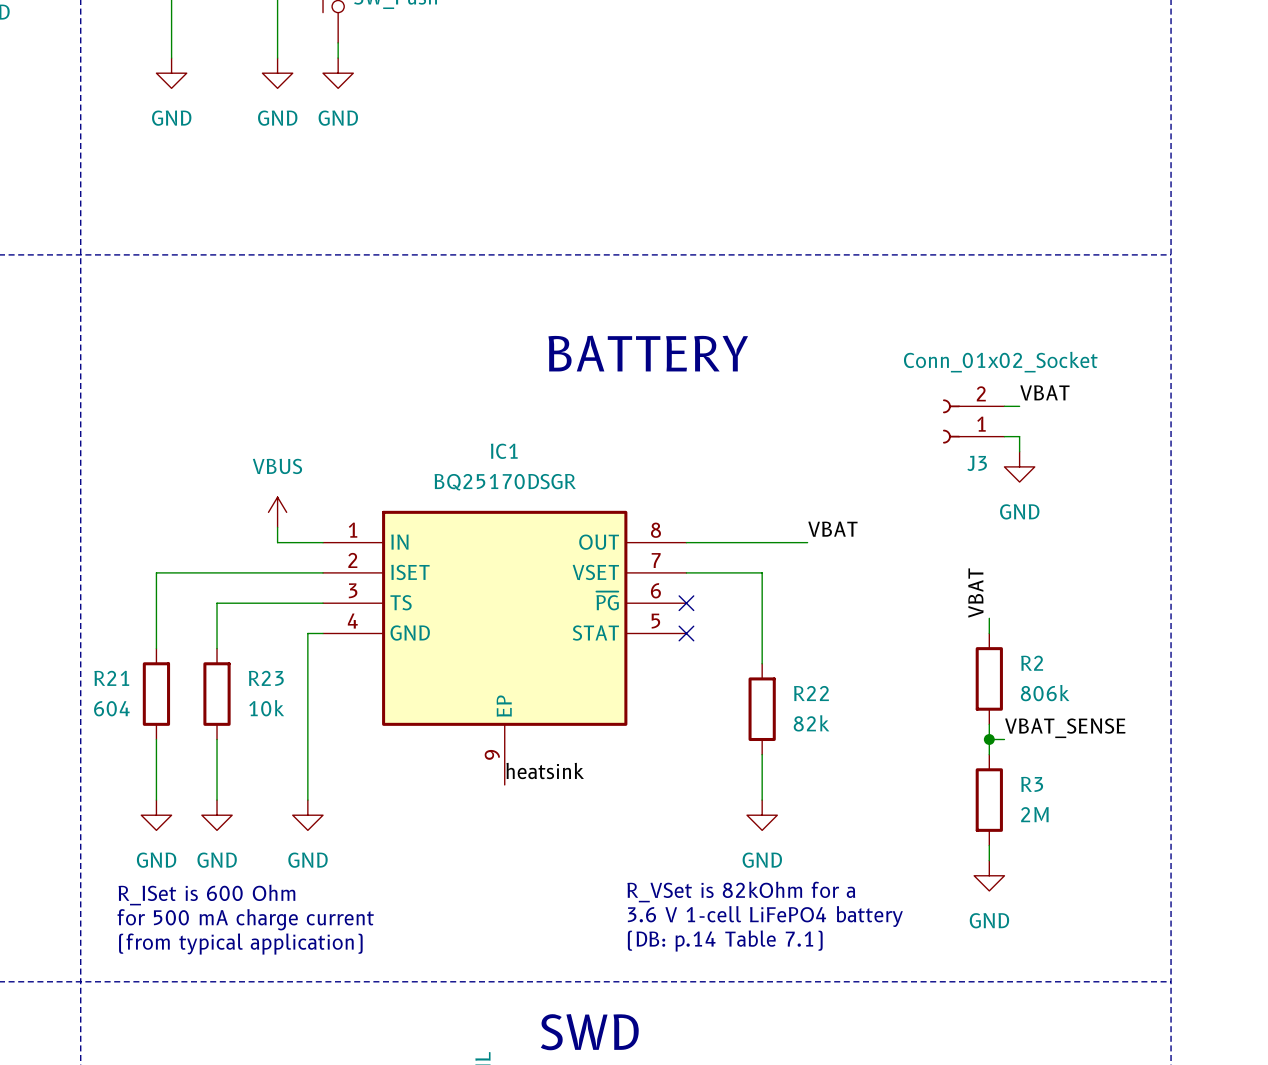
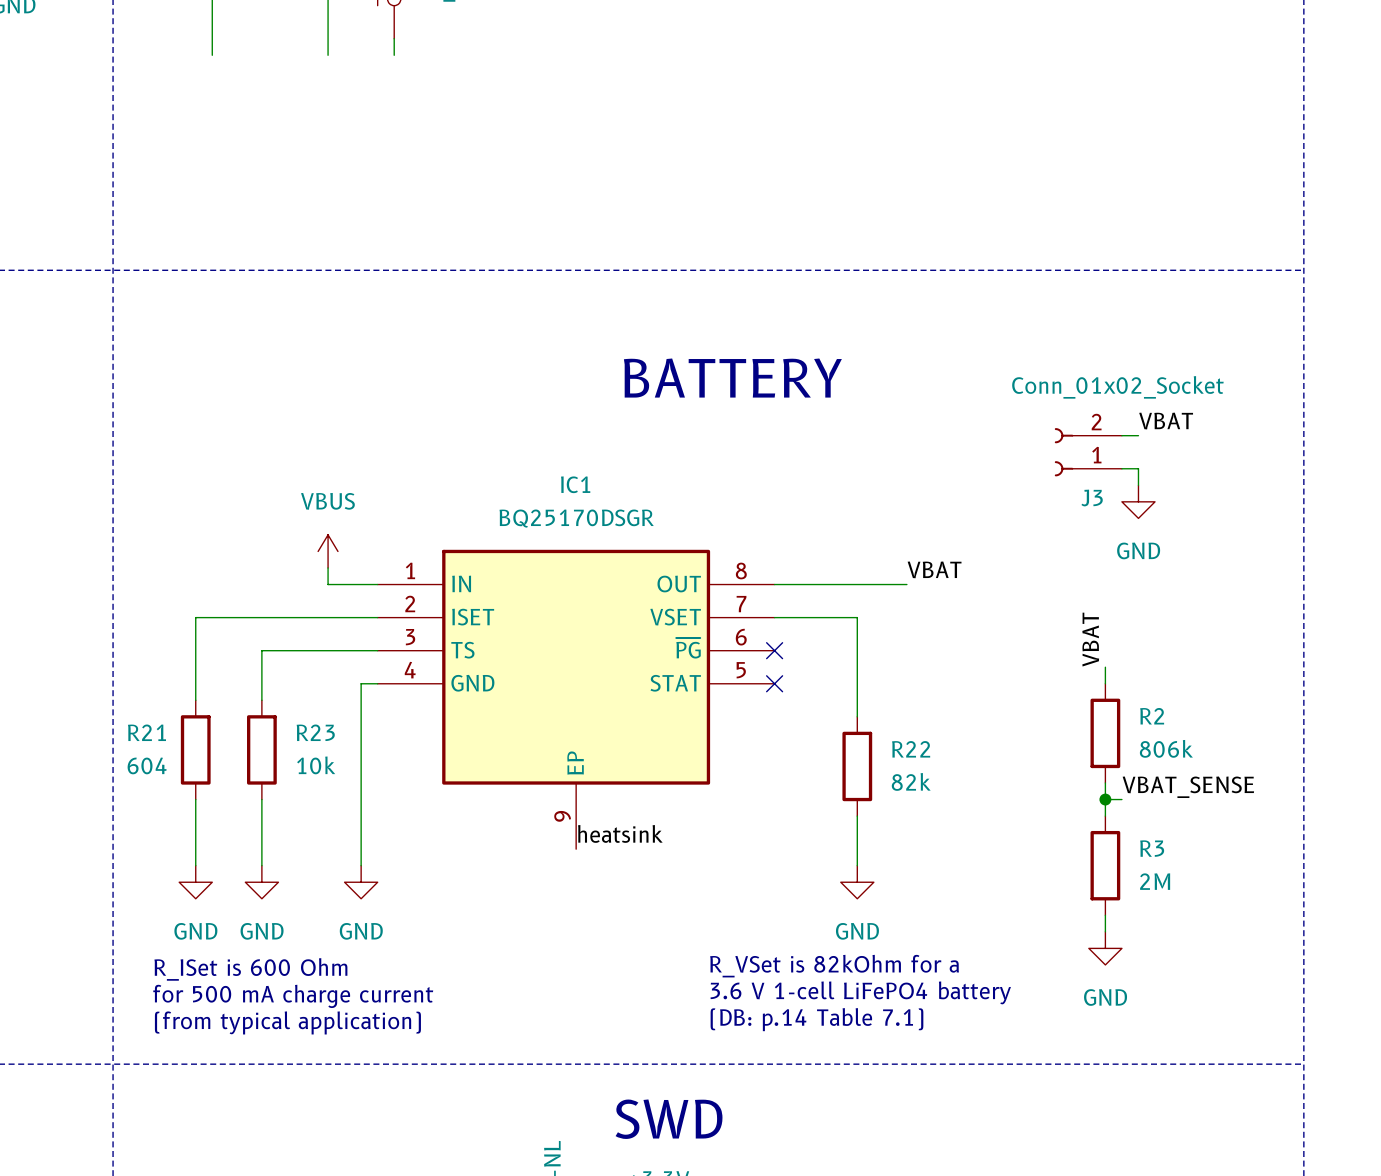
power symbol: GND (171, 73) -> none
power symbol: GND (277, 73) -> none
power symbol: GND (338, 73) -> none

